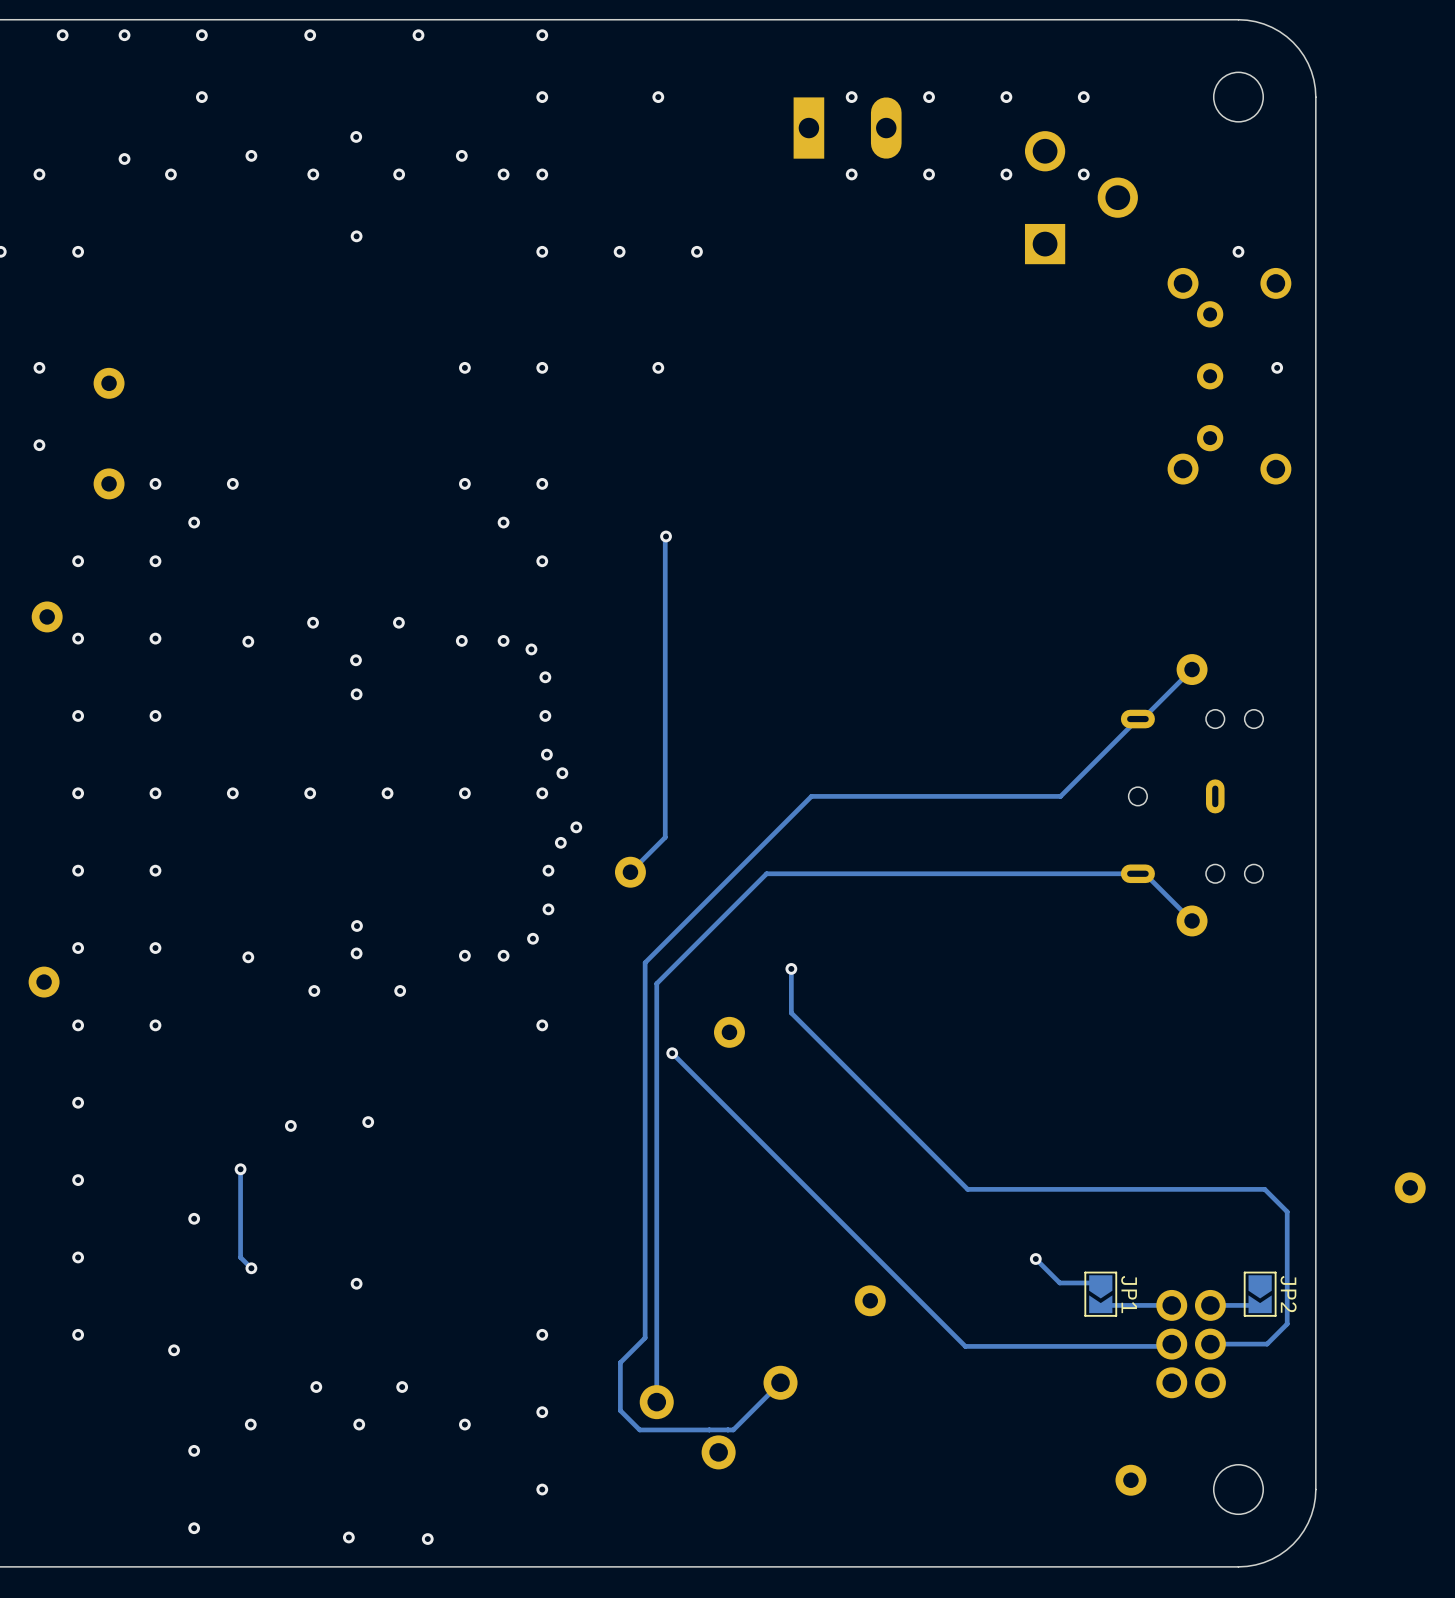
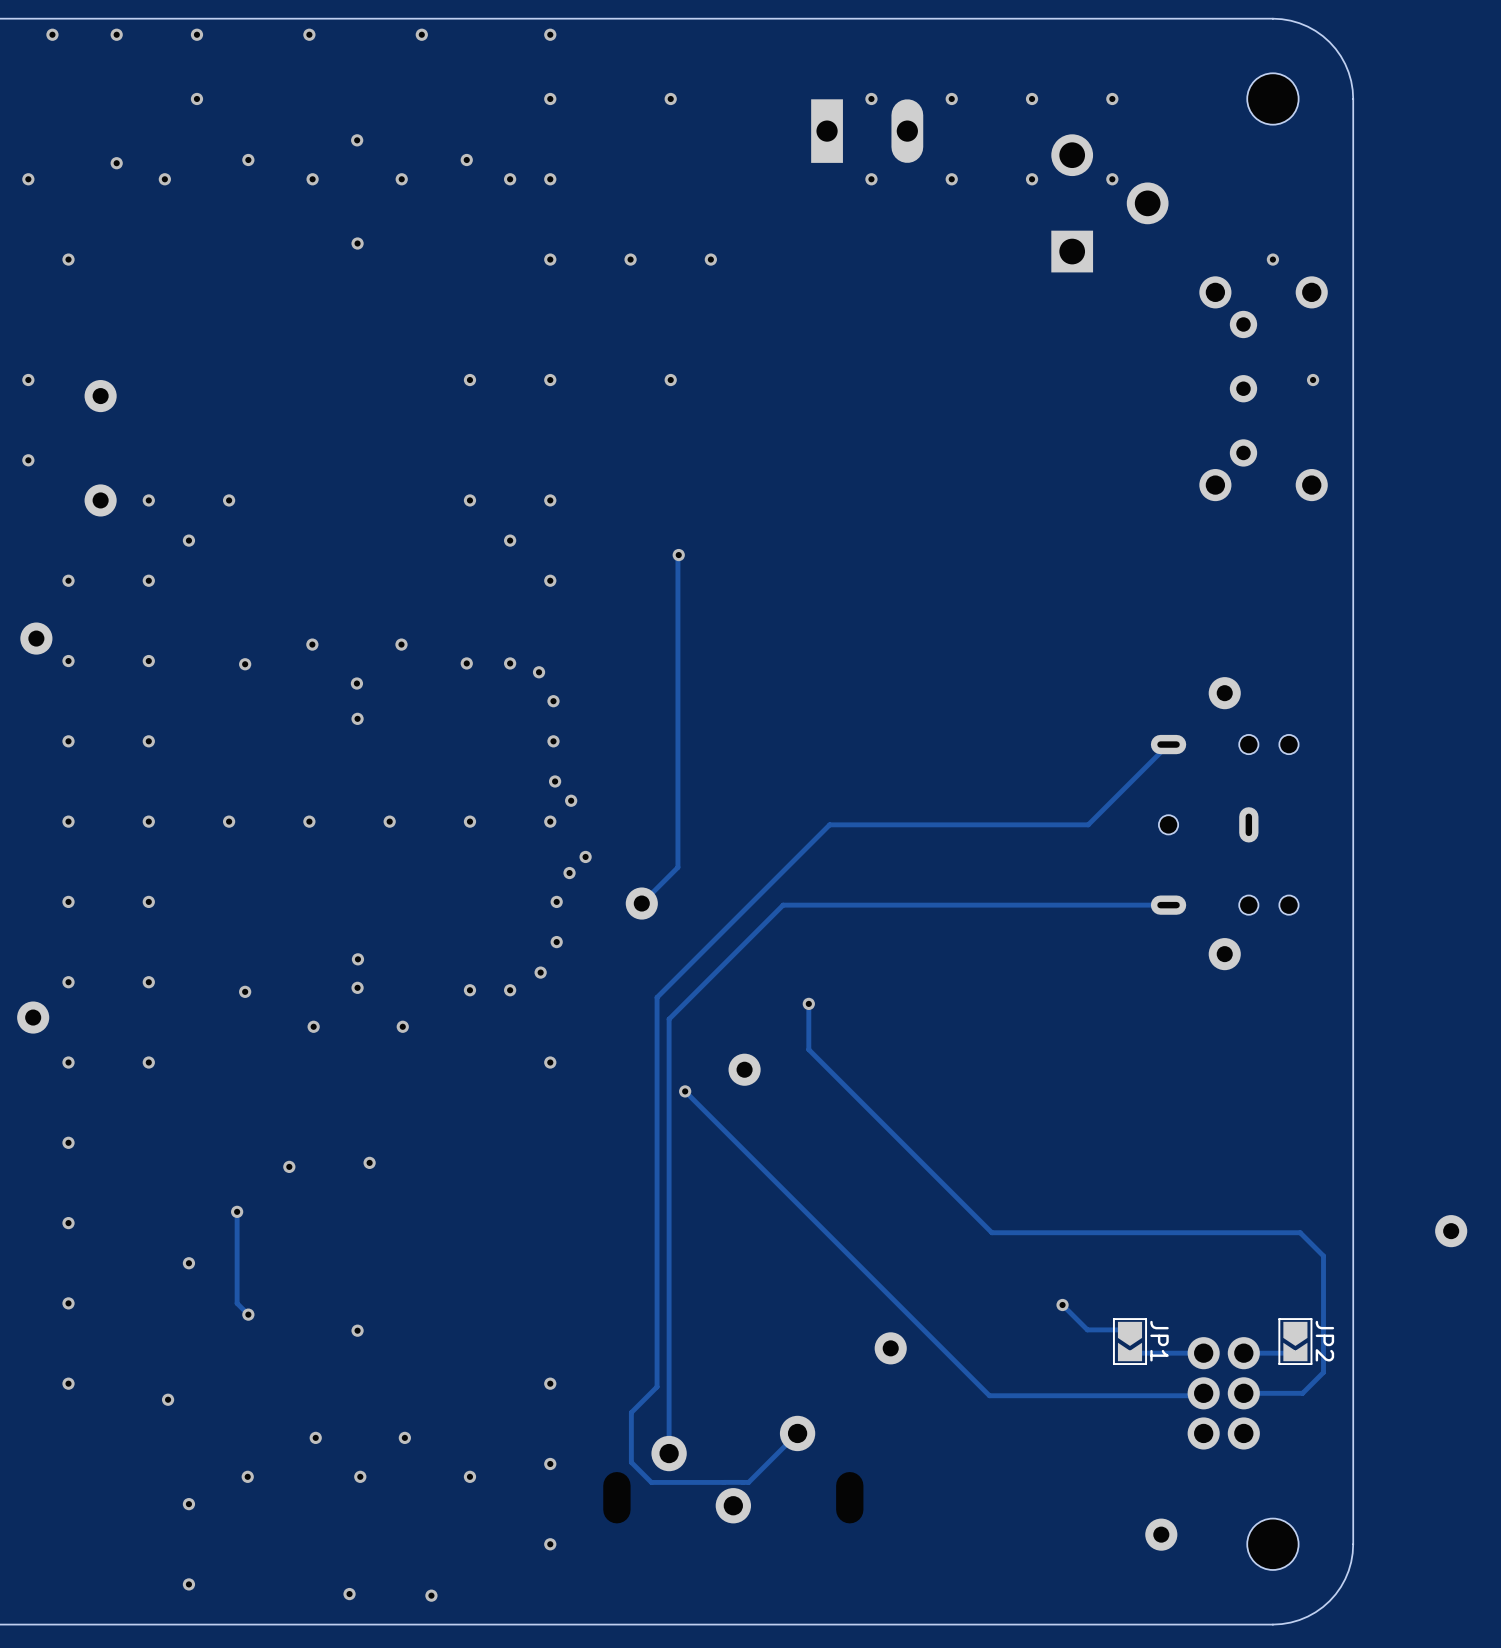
track: (1192, 669) (1142, 719) (1137, 719) -> none
track: (1137, 873) (1144, 873) (1192, 920) -> none

